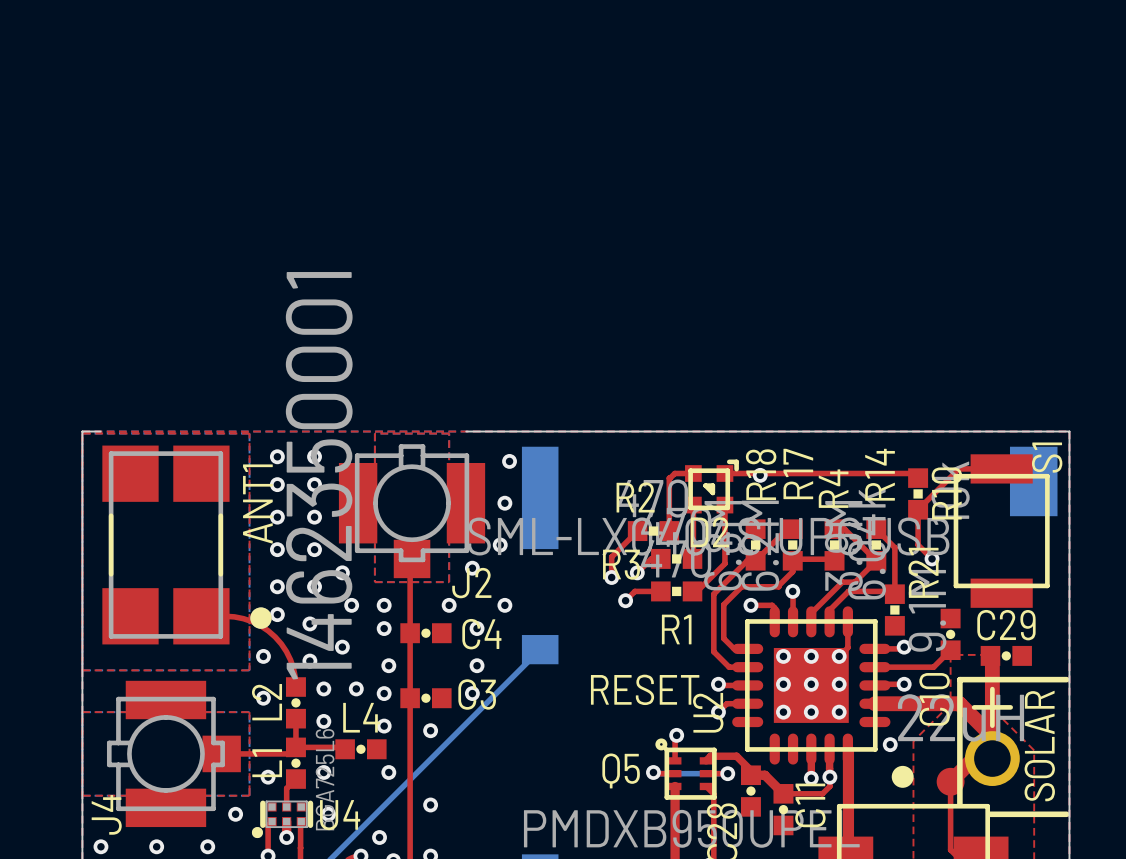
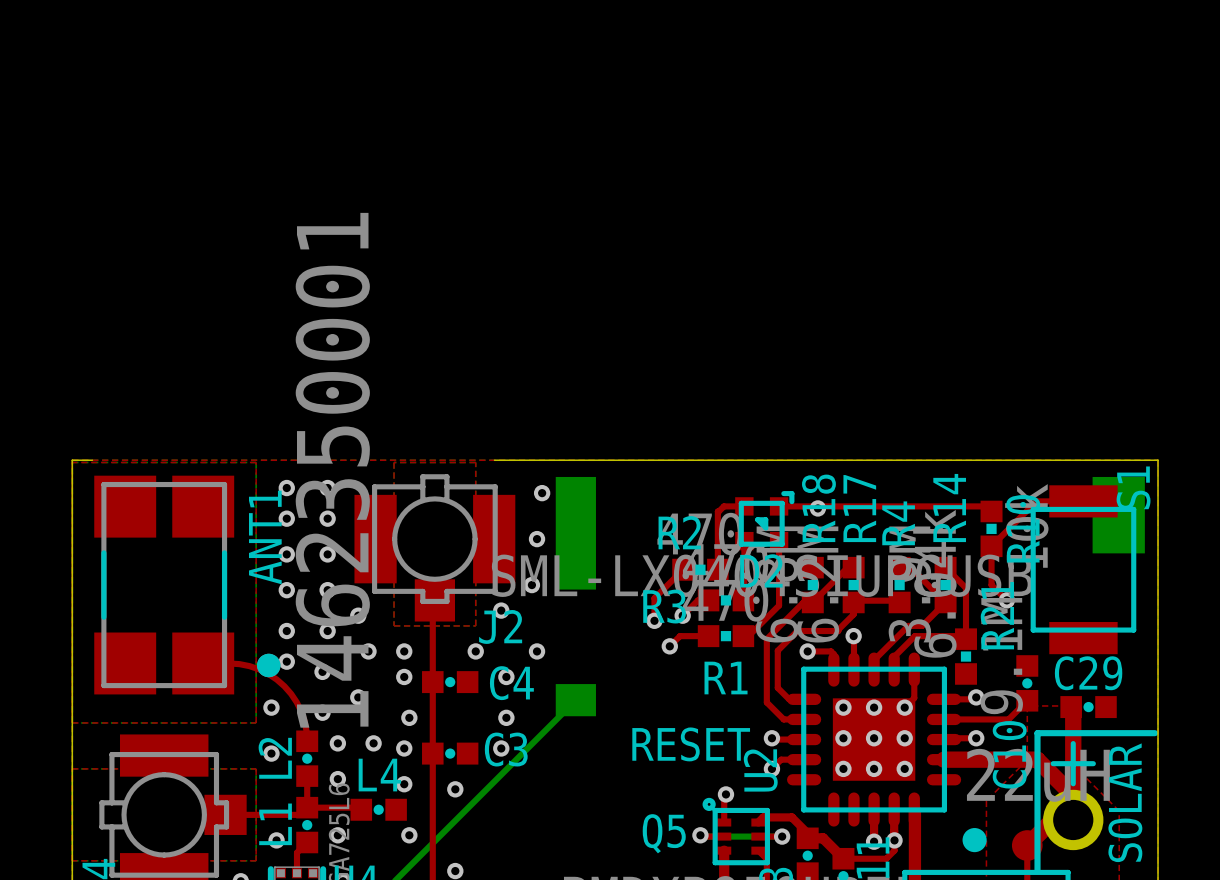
via: (890, 744) -> none

